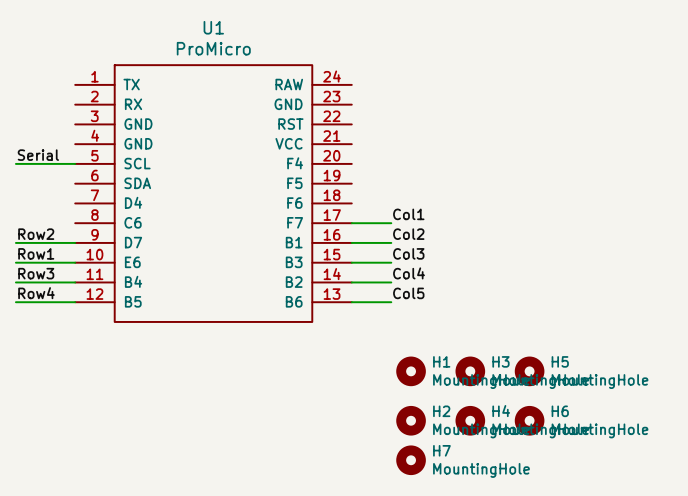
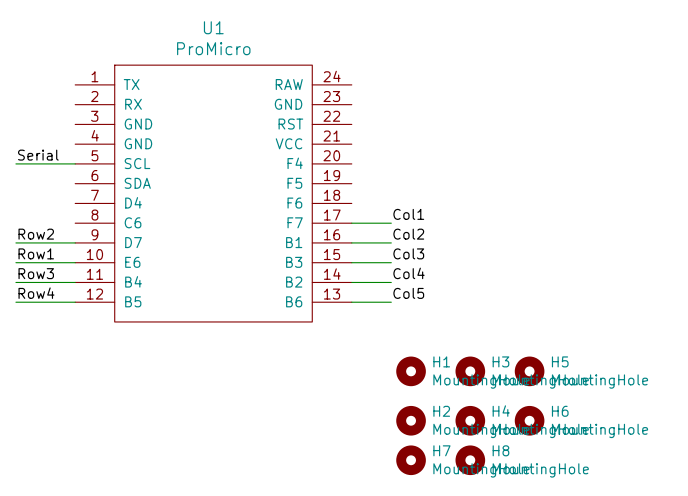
H8: none -> MountingHole (470, 460)

